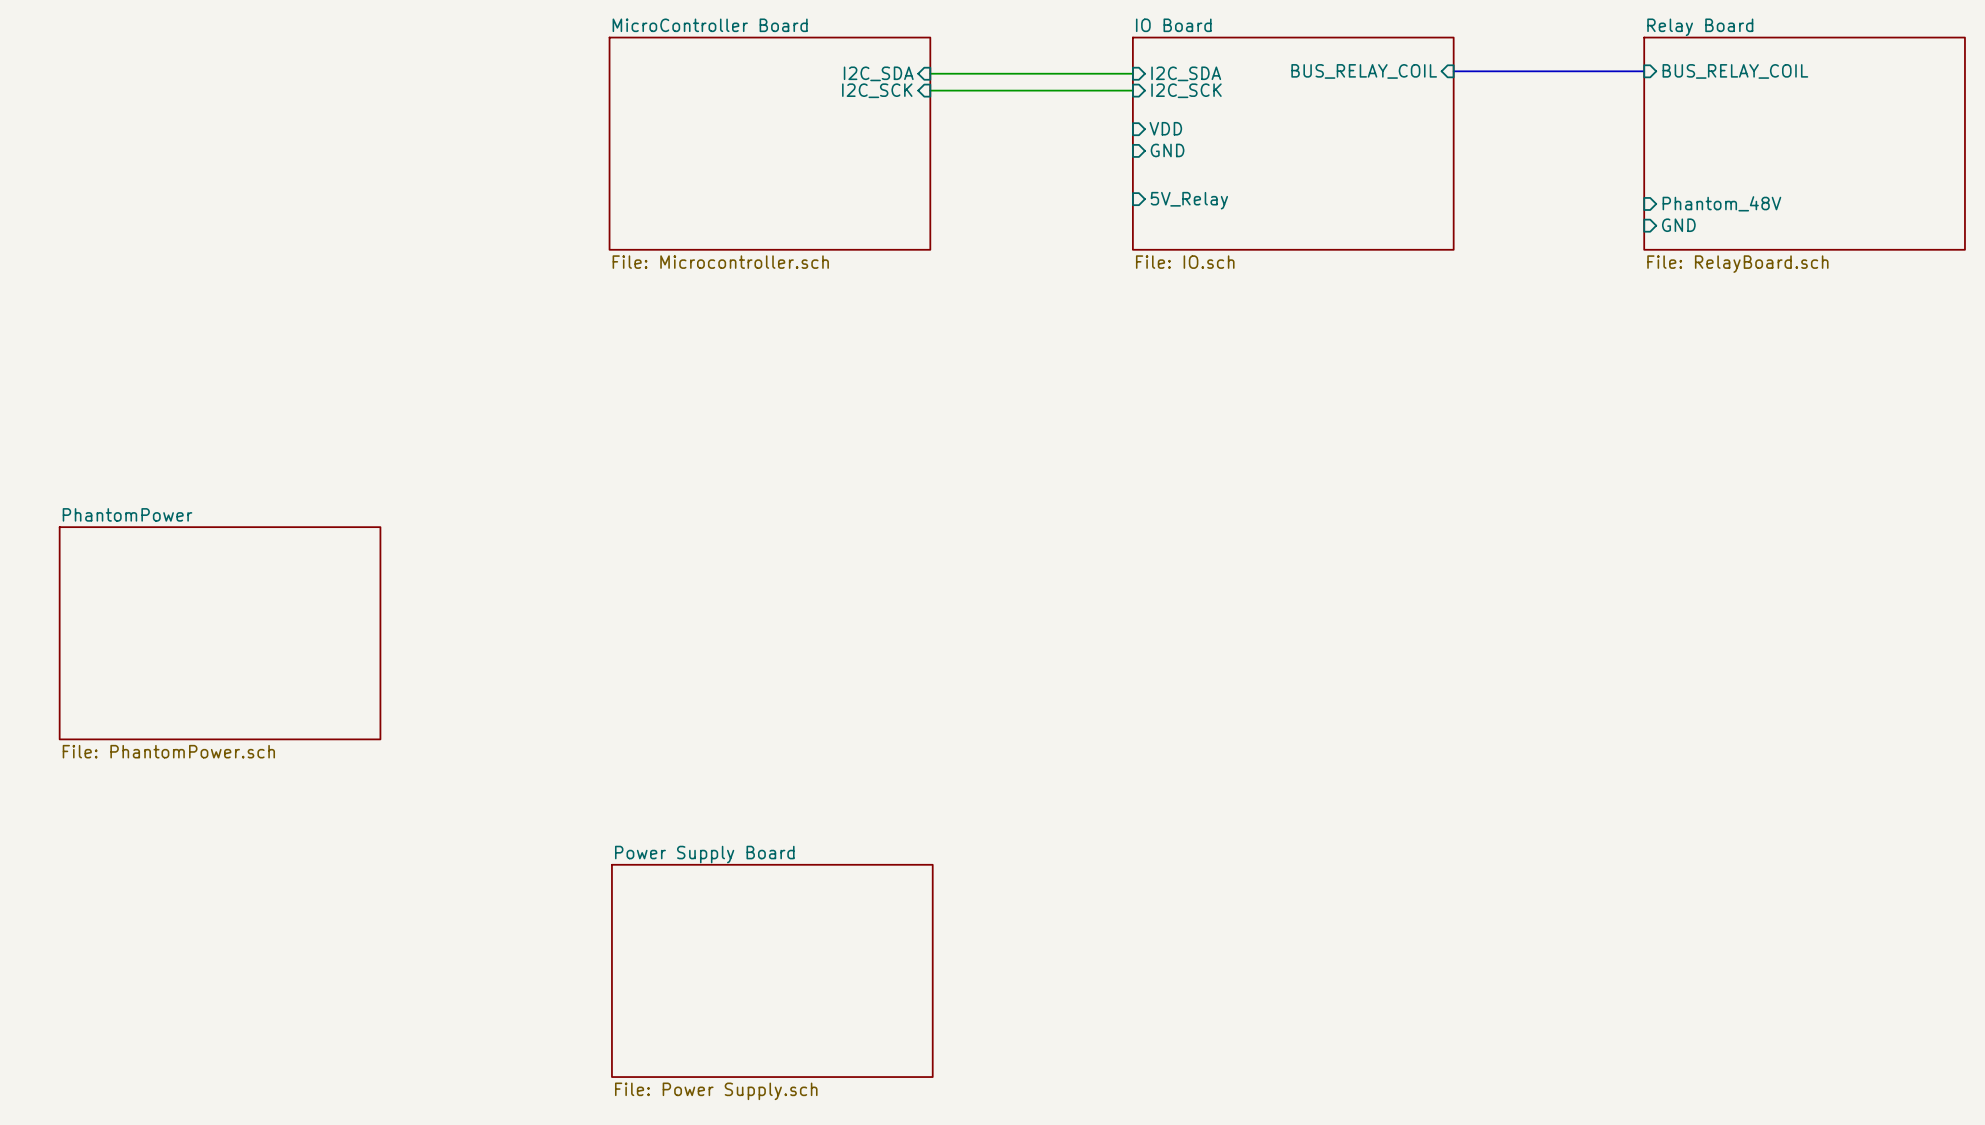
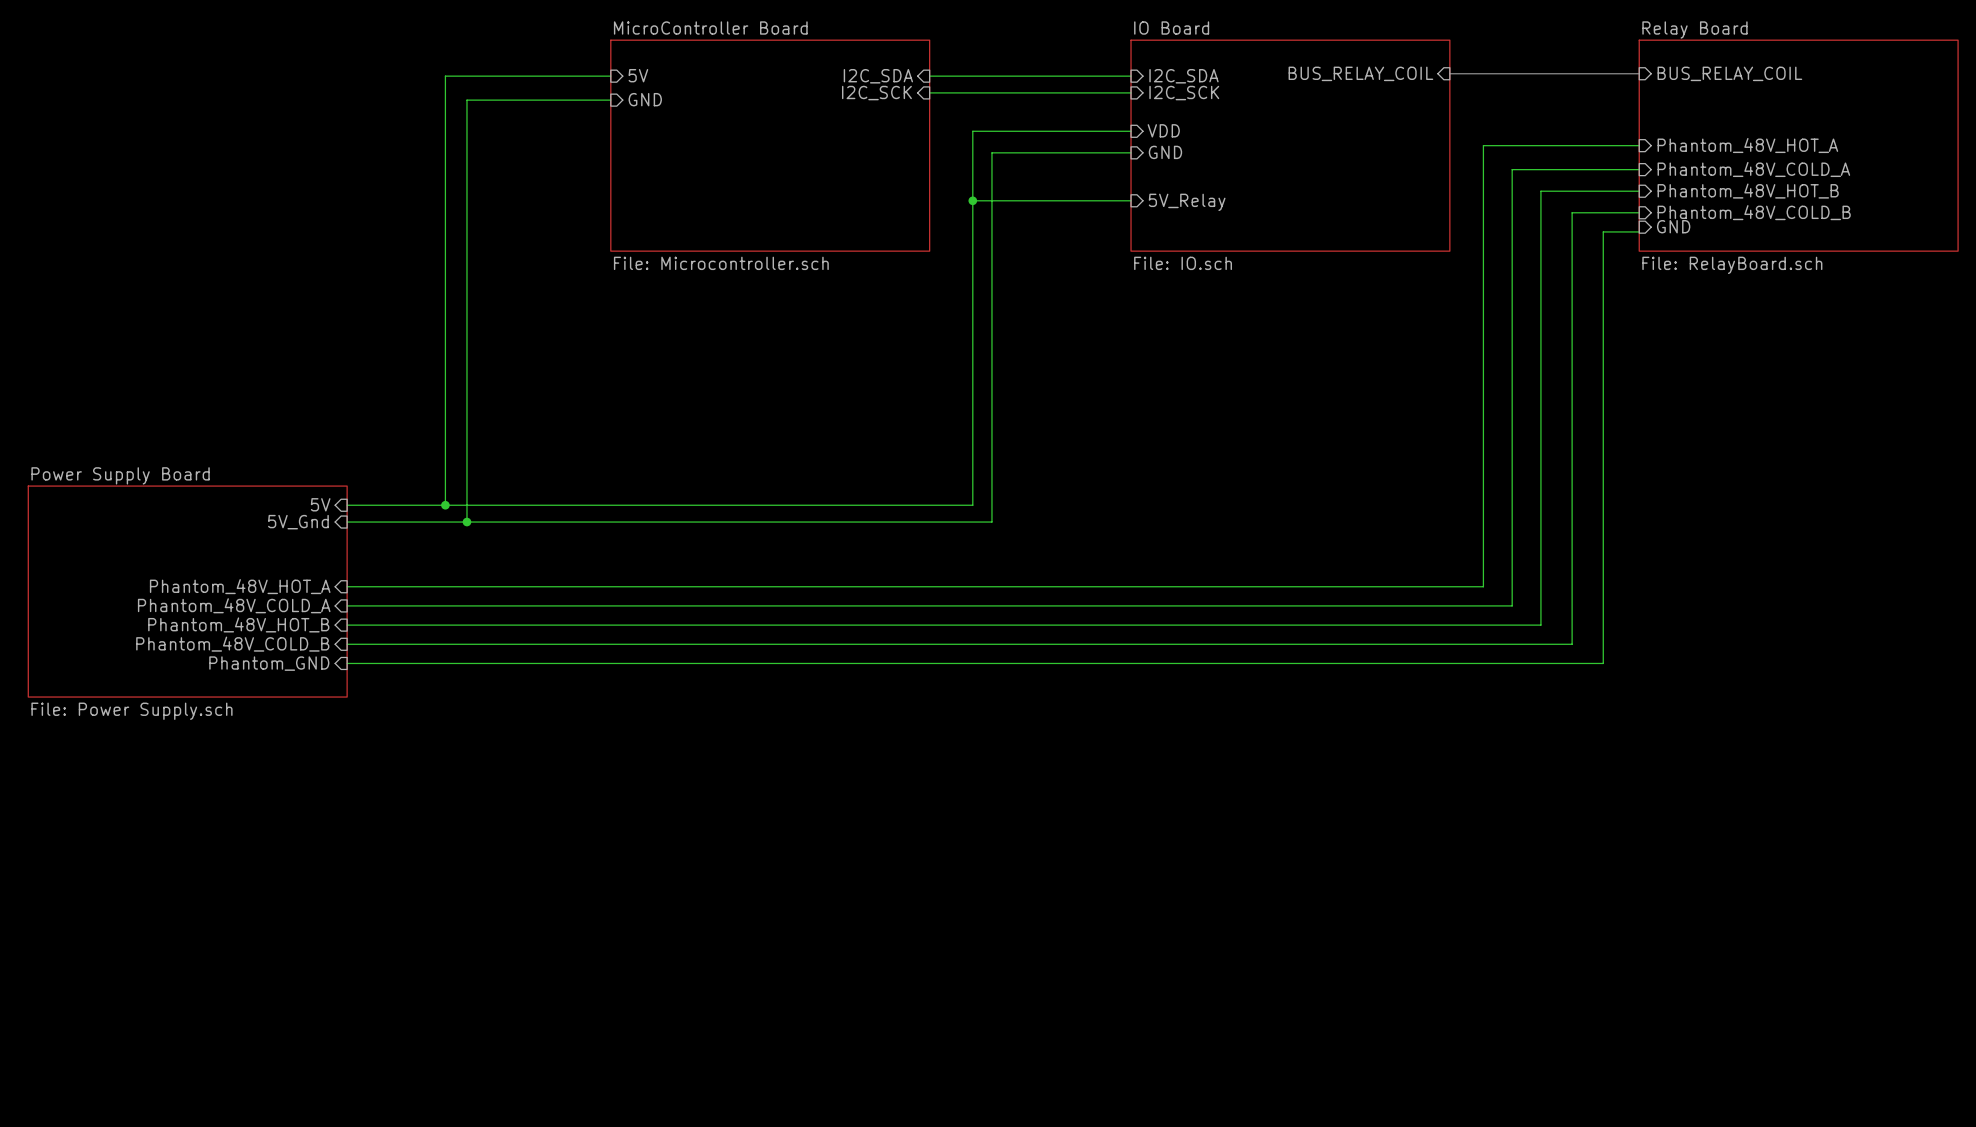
wire: none -> (610, 76) (445, 76) (445, 505)
sheet pin: none -> 5V (638, 75)
wire: none -> (610, 100) (466, 100) (466, 522)
sheet pin: none -> GND (645, 99)
wire: none -> (1131, 131) (972, 131) (972, 505) (347, 505)
wire: none -> (1639, 145) (1483, 145) (1483, 586) (347, 586)
sheet pin: none -> Phantom_48V_HOT_A (1747, 145)
wire: none -> (1131, 152) (991, 152) (991, 522) (347, 522)
wire: none -> (1639, 169) (1512, 169) (1512, 605) (347, 605)
sheet pin: none -> Phantom_48V_COLD_A (1753, 169)
wire: none -> (1639, 191) (1540, 191) (1540, 625) (347, 625)
sheet pin: none -> Phantom_48V_HOT_B (1748, 191)
wire: none -> (972, 200) (1131, 200)
junction: none -> (972, 200)
sheet pin: Phantom_48V (1721, 203) -> none
wire: none -> (1639, 212) (1572, 212) (1572, 644) (347, 644)
sheet pin: none -> Phantom_48V_COLD_B (1754, 212)
wire: none -> (1639, 231) (1603, 231) (1603, 663) (347, 663)
sheet pin: none -> 5V (320, 504)
junction: none -> (445, 505)
sheet pin: none -> 5V_Gnd (298, 522)
junction: none -> (466, 522)
sheet pin: none -> Phantom_48V_HOT_A (240, 586)
sheet Power Supply Board: none -> File: Power Supply.sch (187, 591)
sheet pin: none -> Phantom_48V_COLD_A (234, 605)
sheet pin: none -> Phantom_48V_HOT_B (238, 624)
sheet PhantomPower: File: PhantomPower.sch (220, 633) -> none
sheet pin: none -> Phantom_48V_COLD_B (232, 644)
sheet pin: none -> Phantom_GND (269, 663)
sheet Power Supply Board: File: Power Supply.sch (772, 970) -> none

